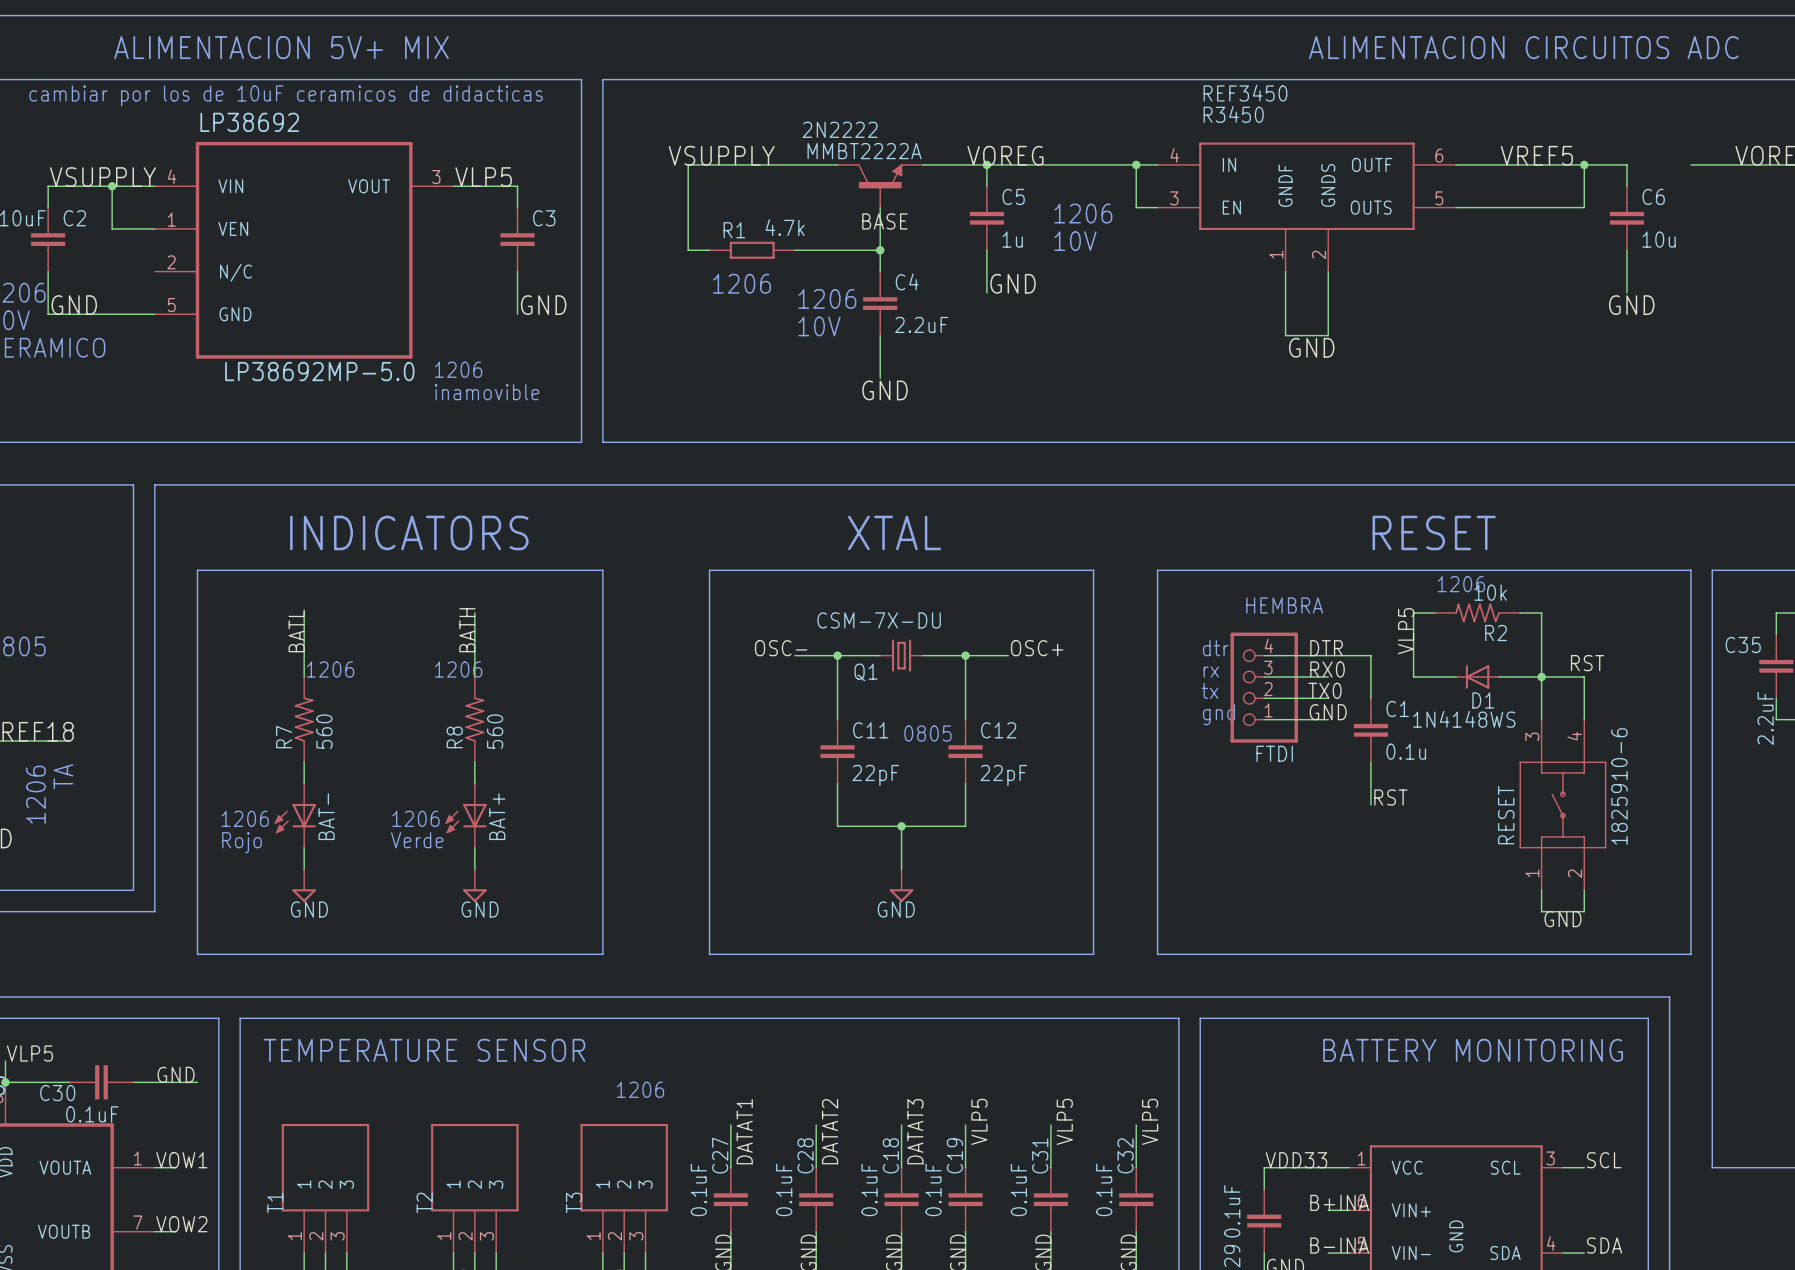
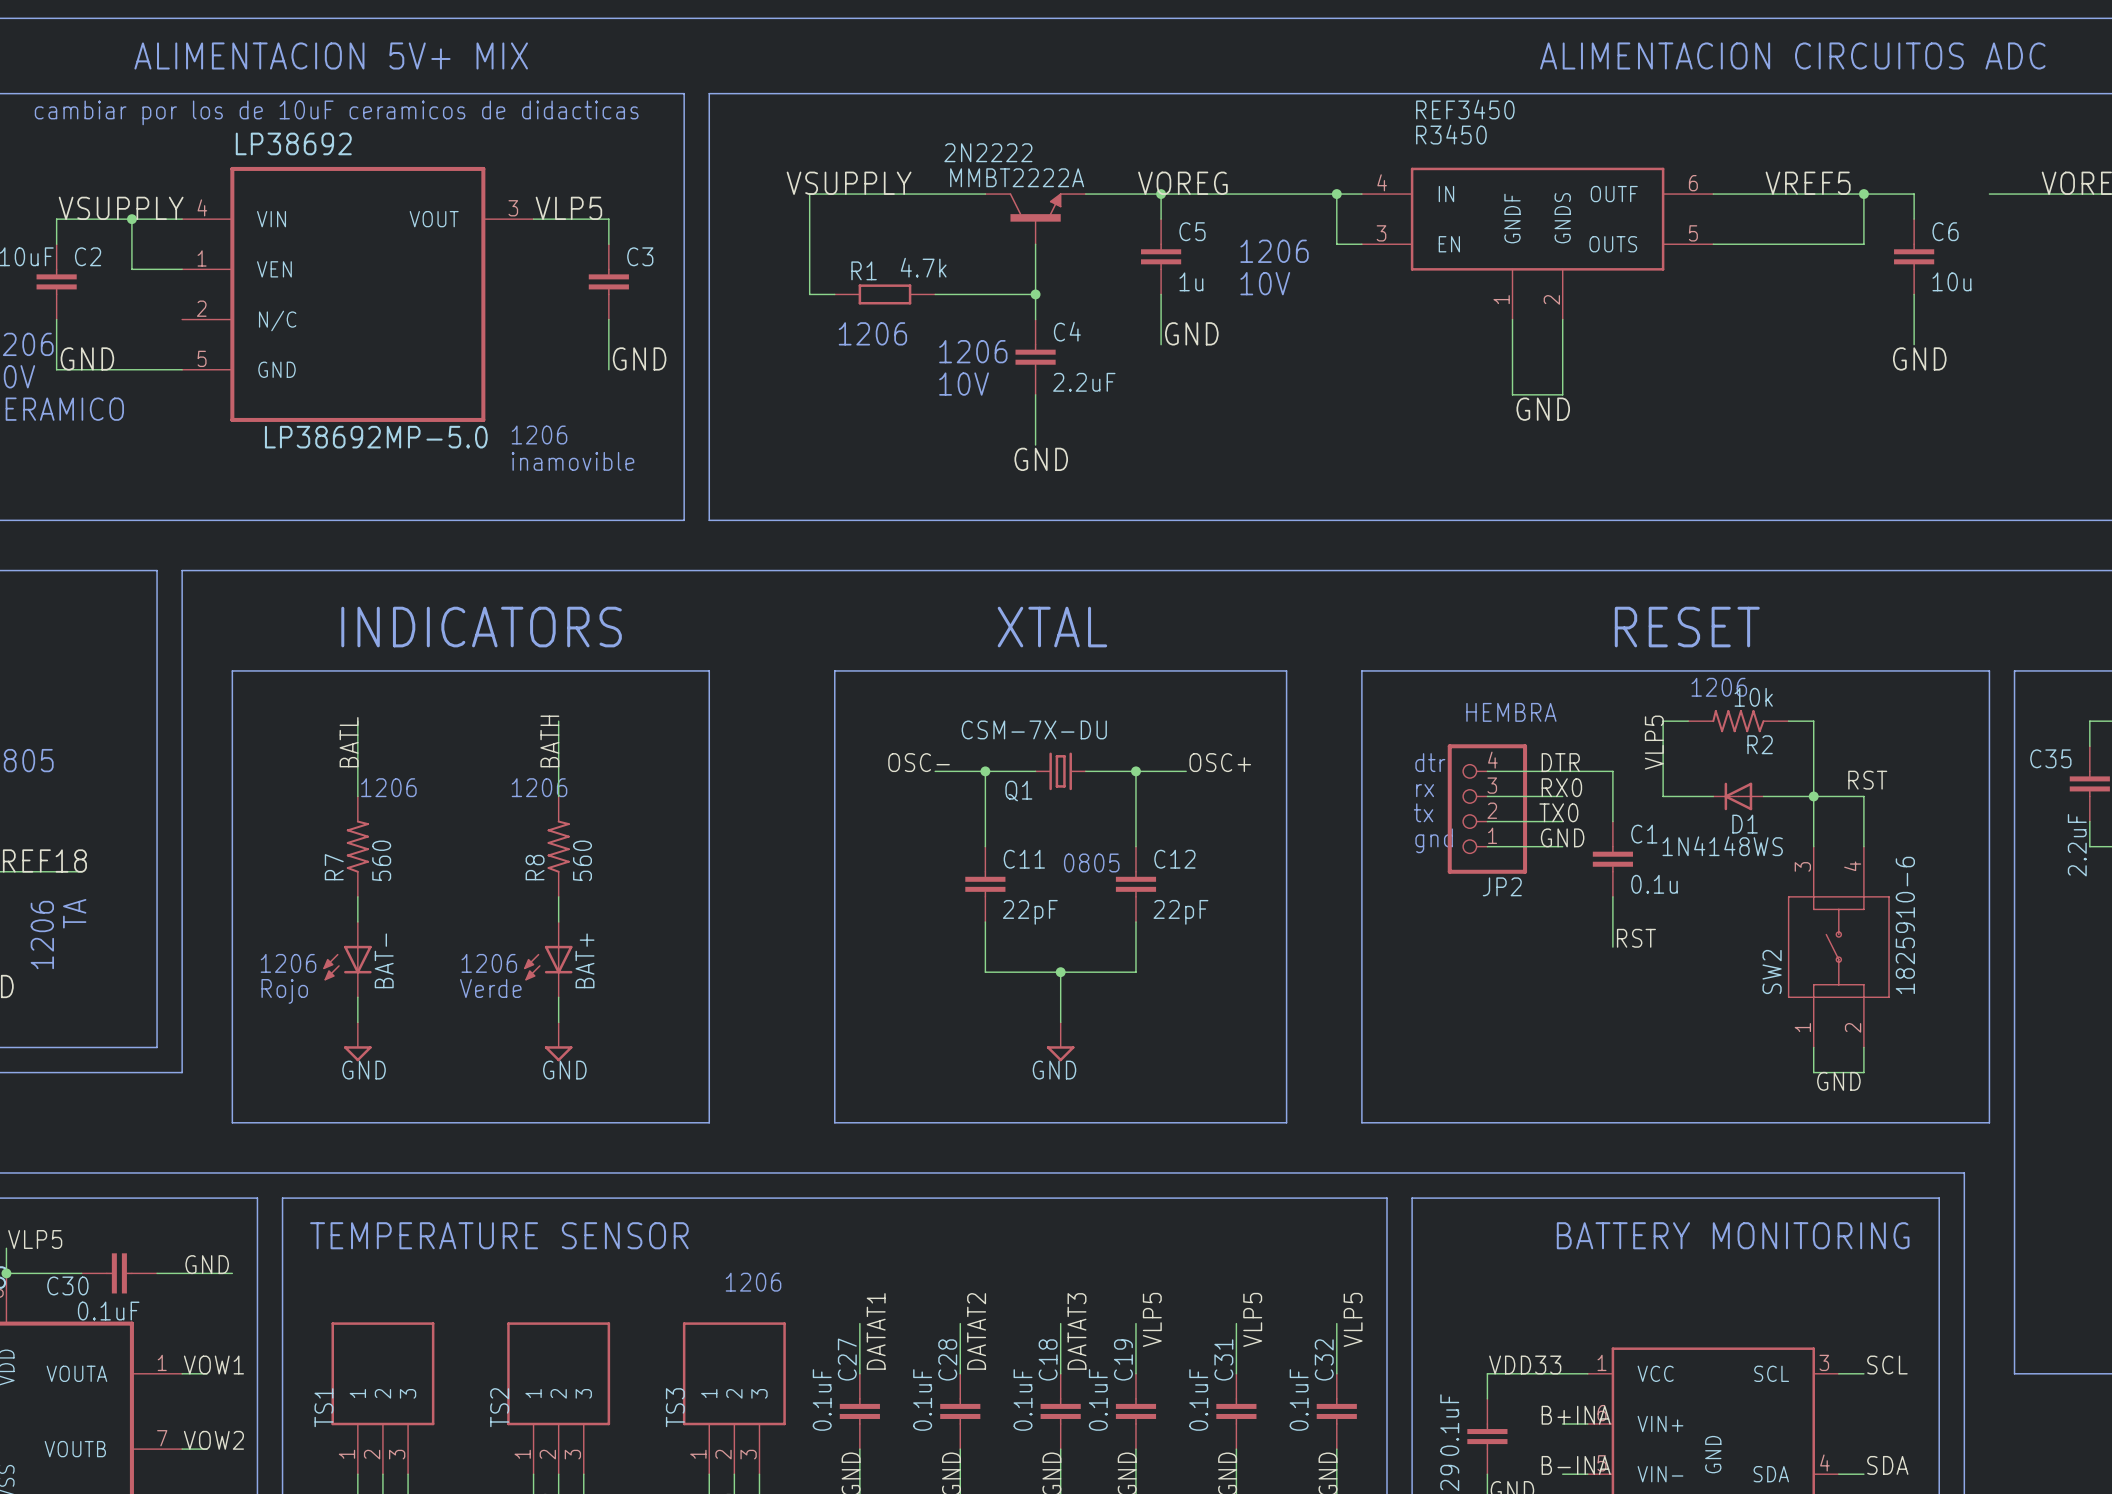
label: BASE (884, 221) -> none
FTDI name: FTDI (1274, 753) -> JP2 (1502, 886)
RESET name: RESET (1506, 815) -> SW2 (1772, 971)
T1 name: T1 (275, 1202) -> TS1 (323, 1407)
T2 name: T2 (424, 1202) -> TS2 (499, 1407)
T3 name: T3 (574, 1202) -> TS3 (675, 1407)

